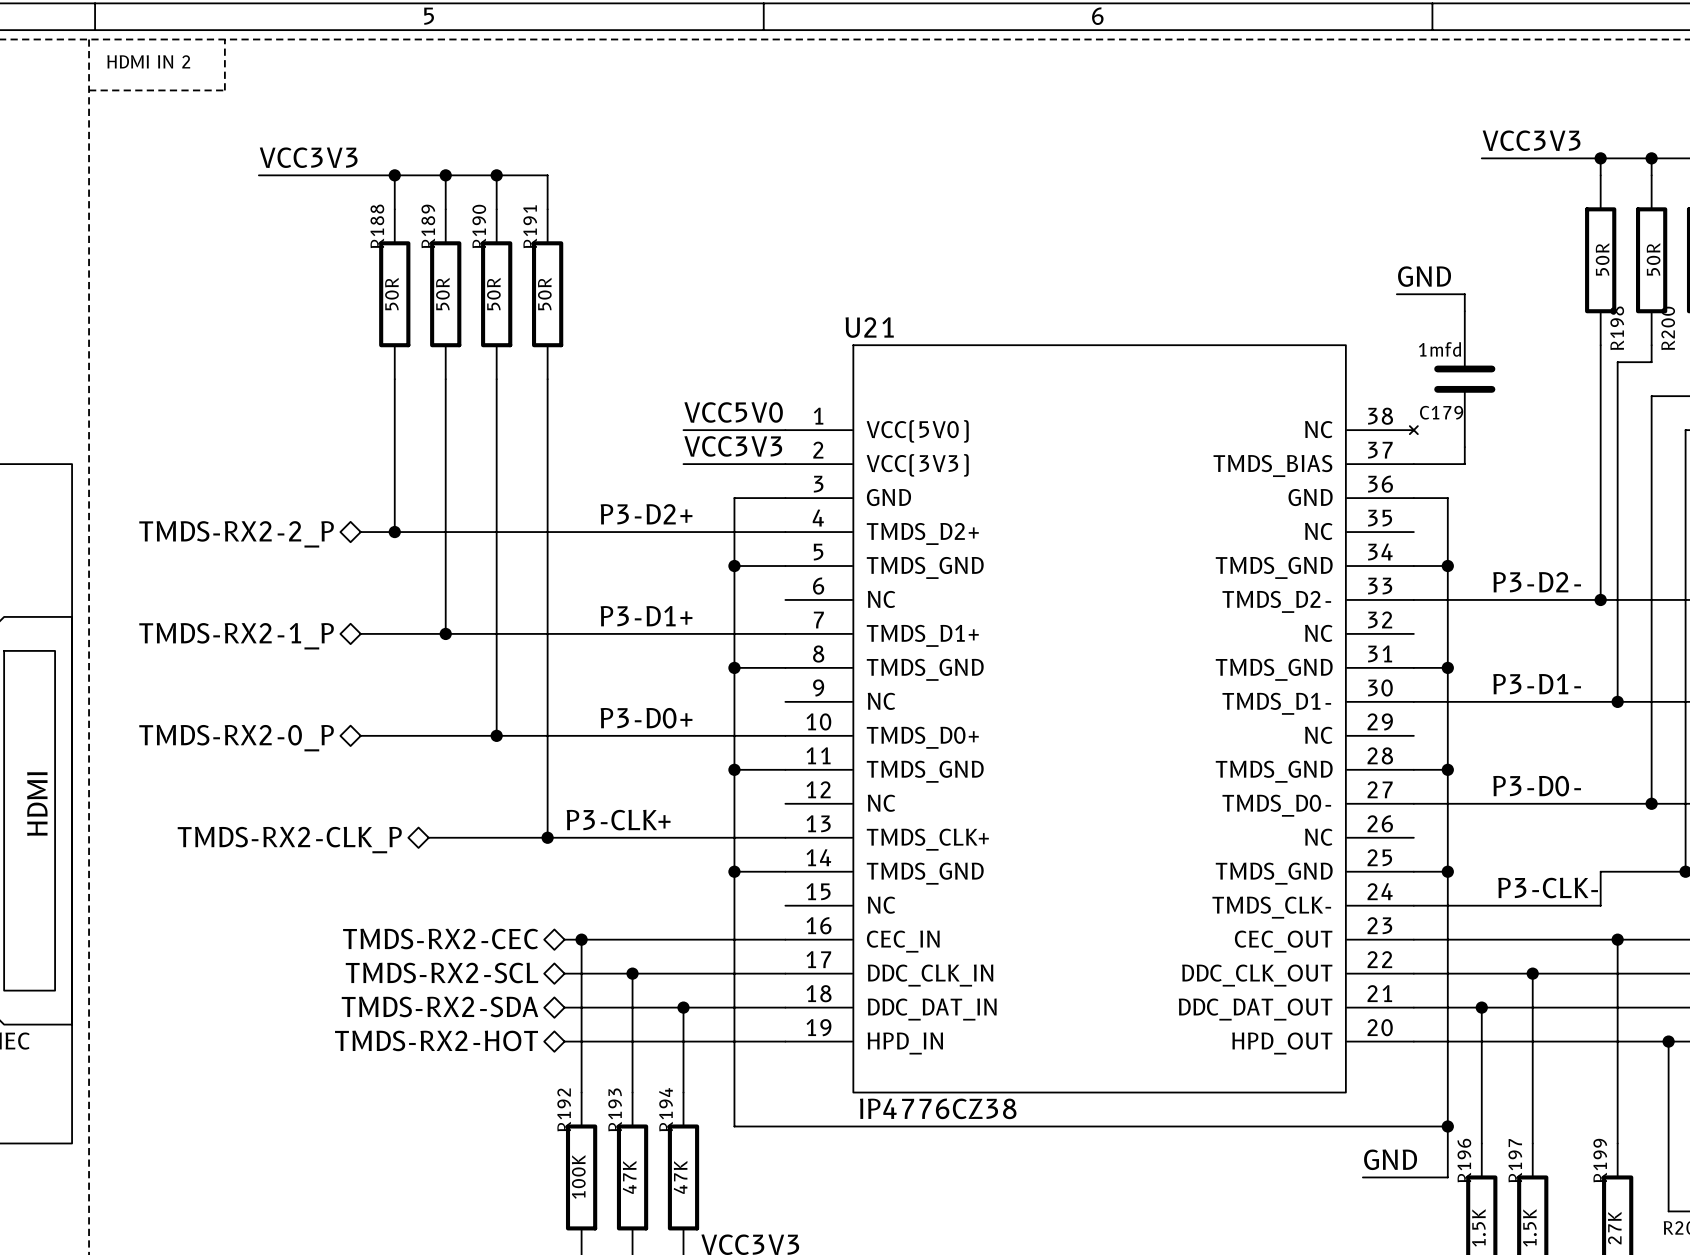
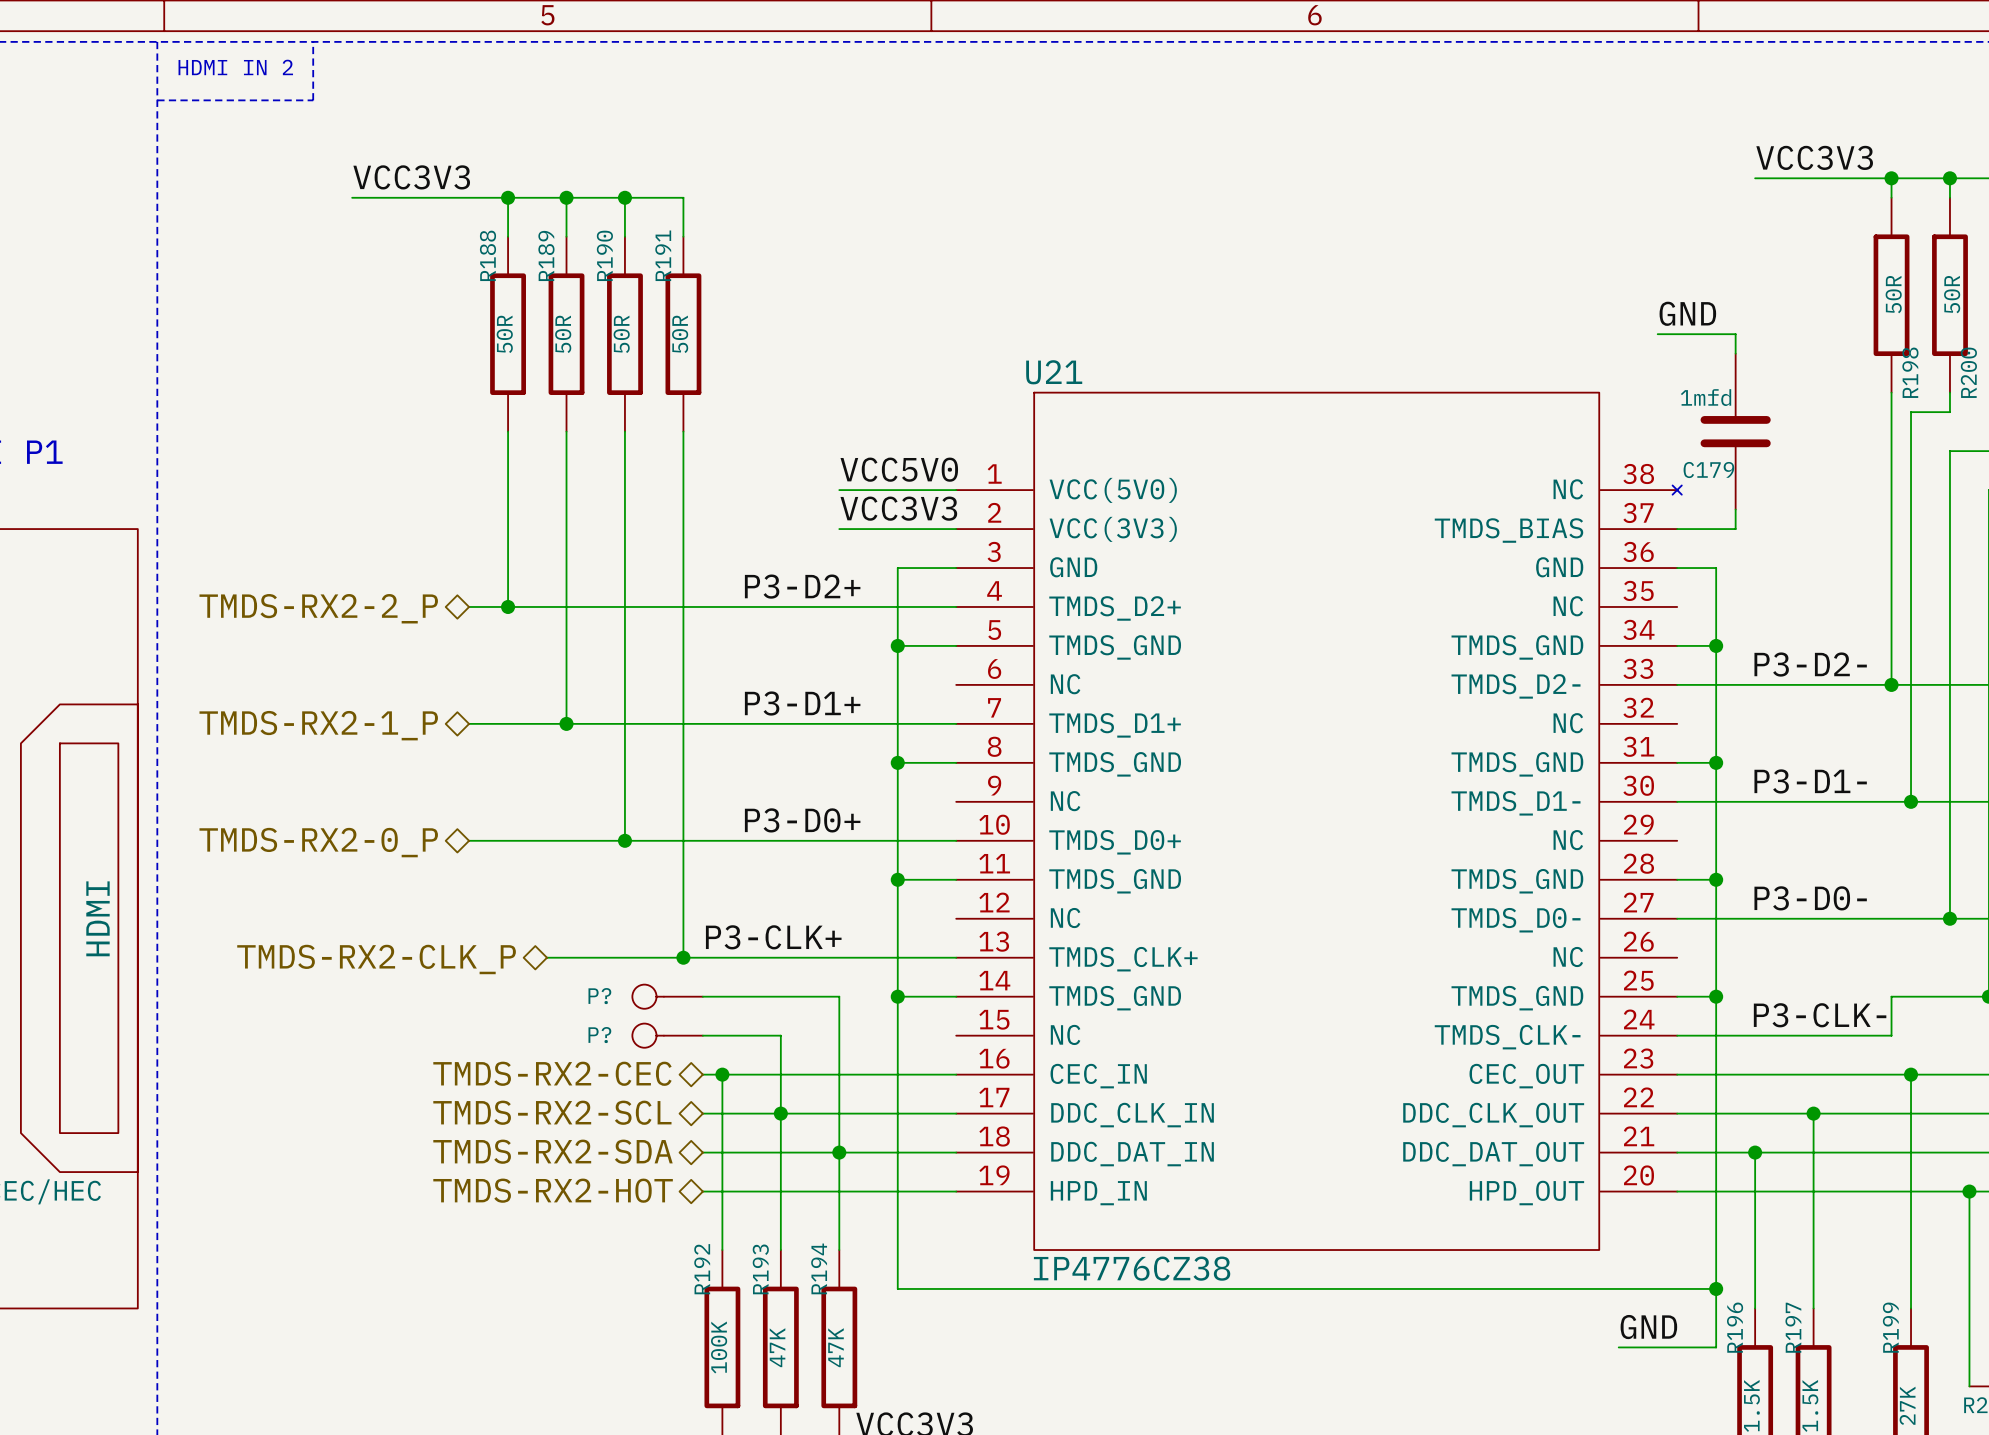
P?: none -> (667, 996)
wire: none -> (702, 996) (839, 996) (839, 1152)
P?: none -> (667, 1035)
wire: none -> (702, 1035) (780, 1035) (780, 1113)

